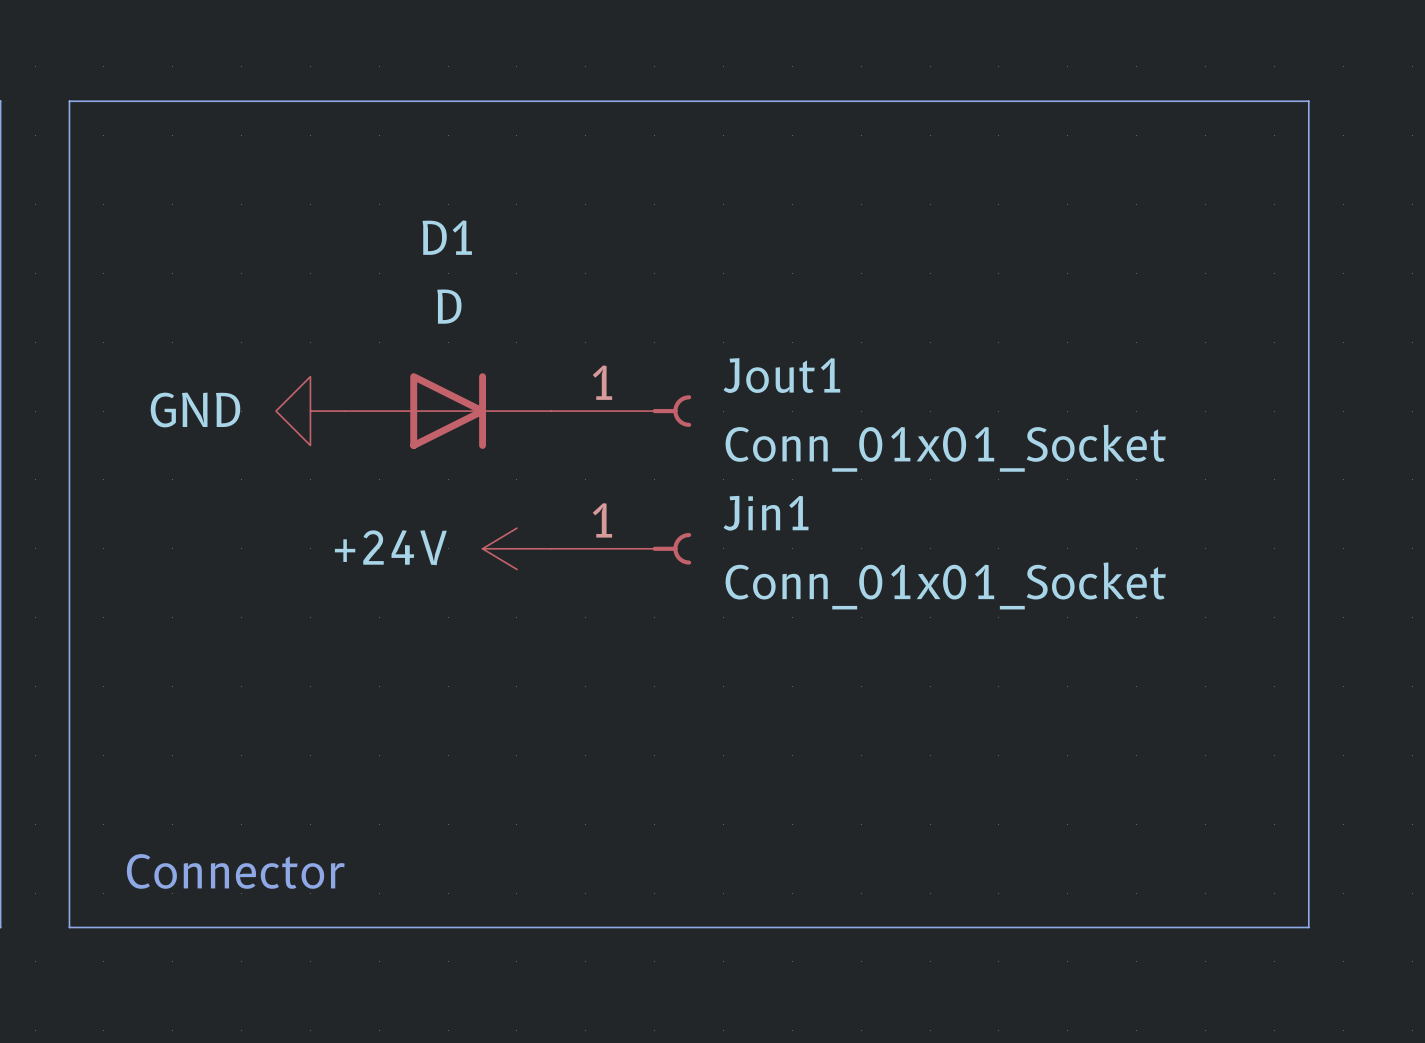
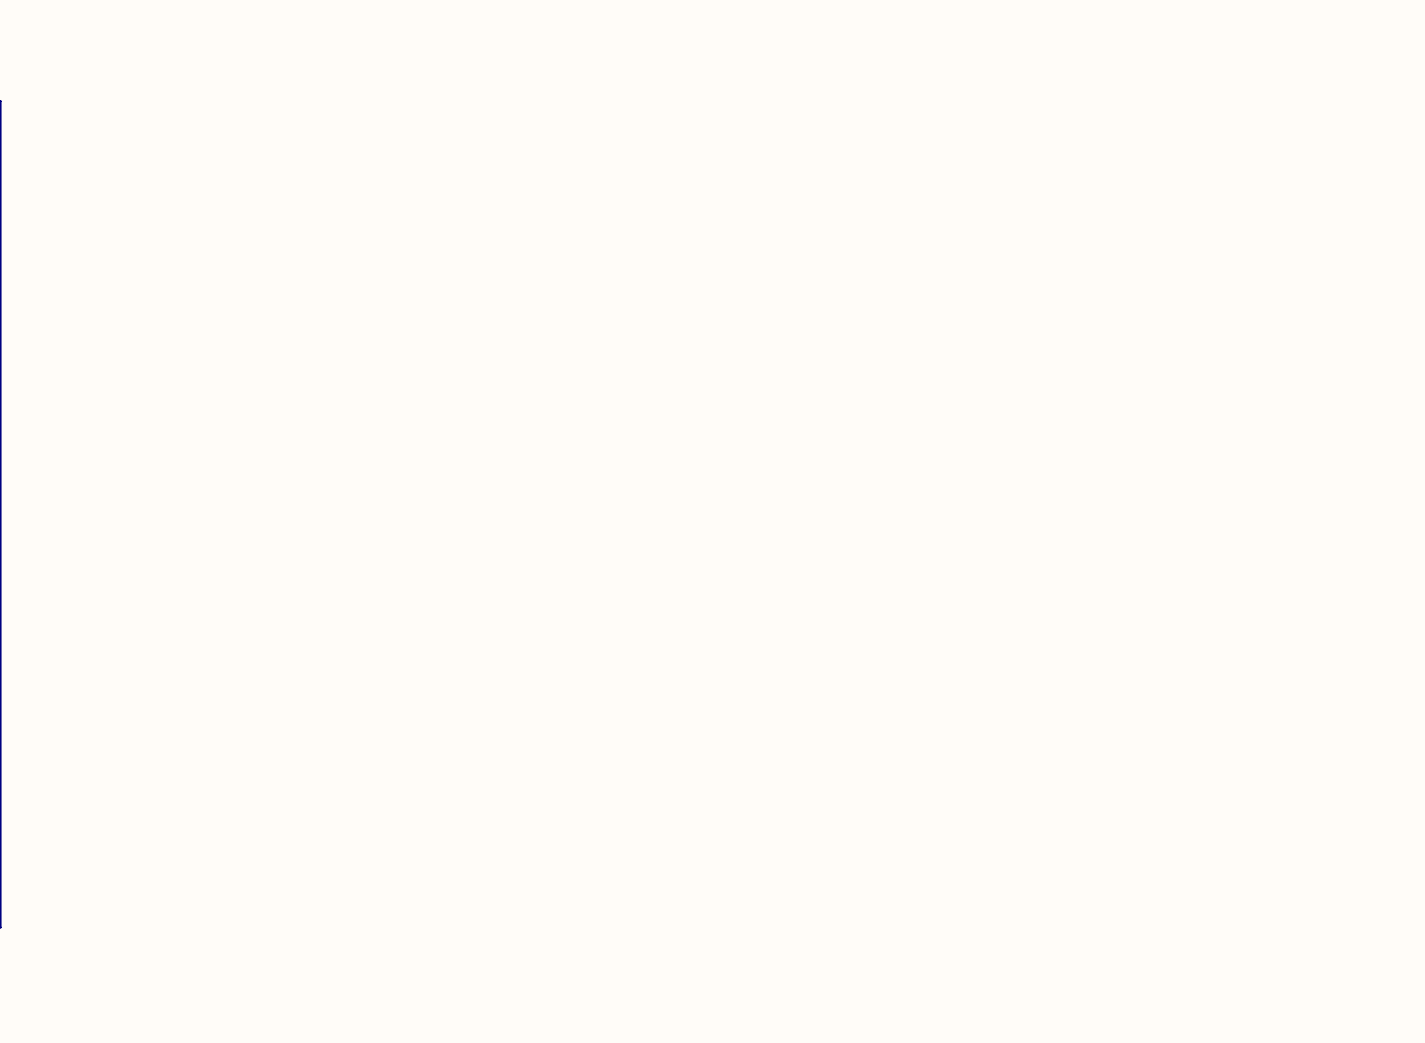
line: (69, 101) (1308, 101) (1308, 927) (69, 927) (69, 101) -> none
power symbol: GND (310, 411) -> none
D1: D (448, 411) -> none
Jout1: Conn_01x01_Socket (621, 411) -> none
power symbol: +24V (516, 548) -> none
Jin1: Conn_01x01_Socket (621, 548) -> none
text: Connector (235, 871) -> none

